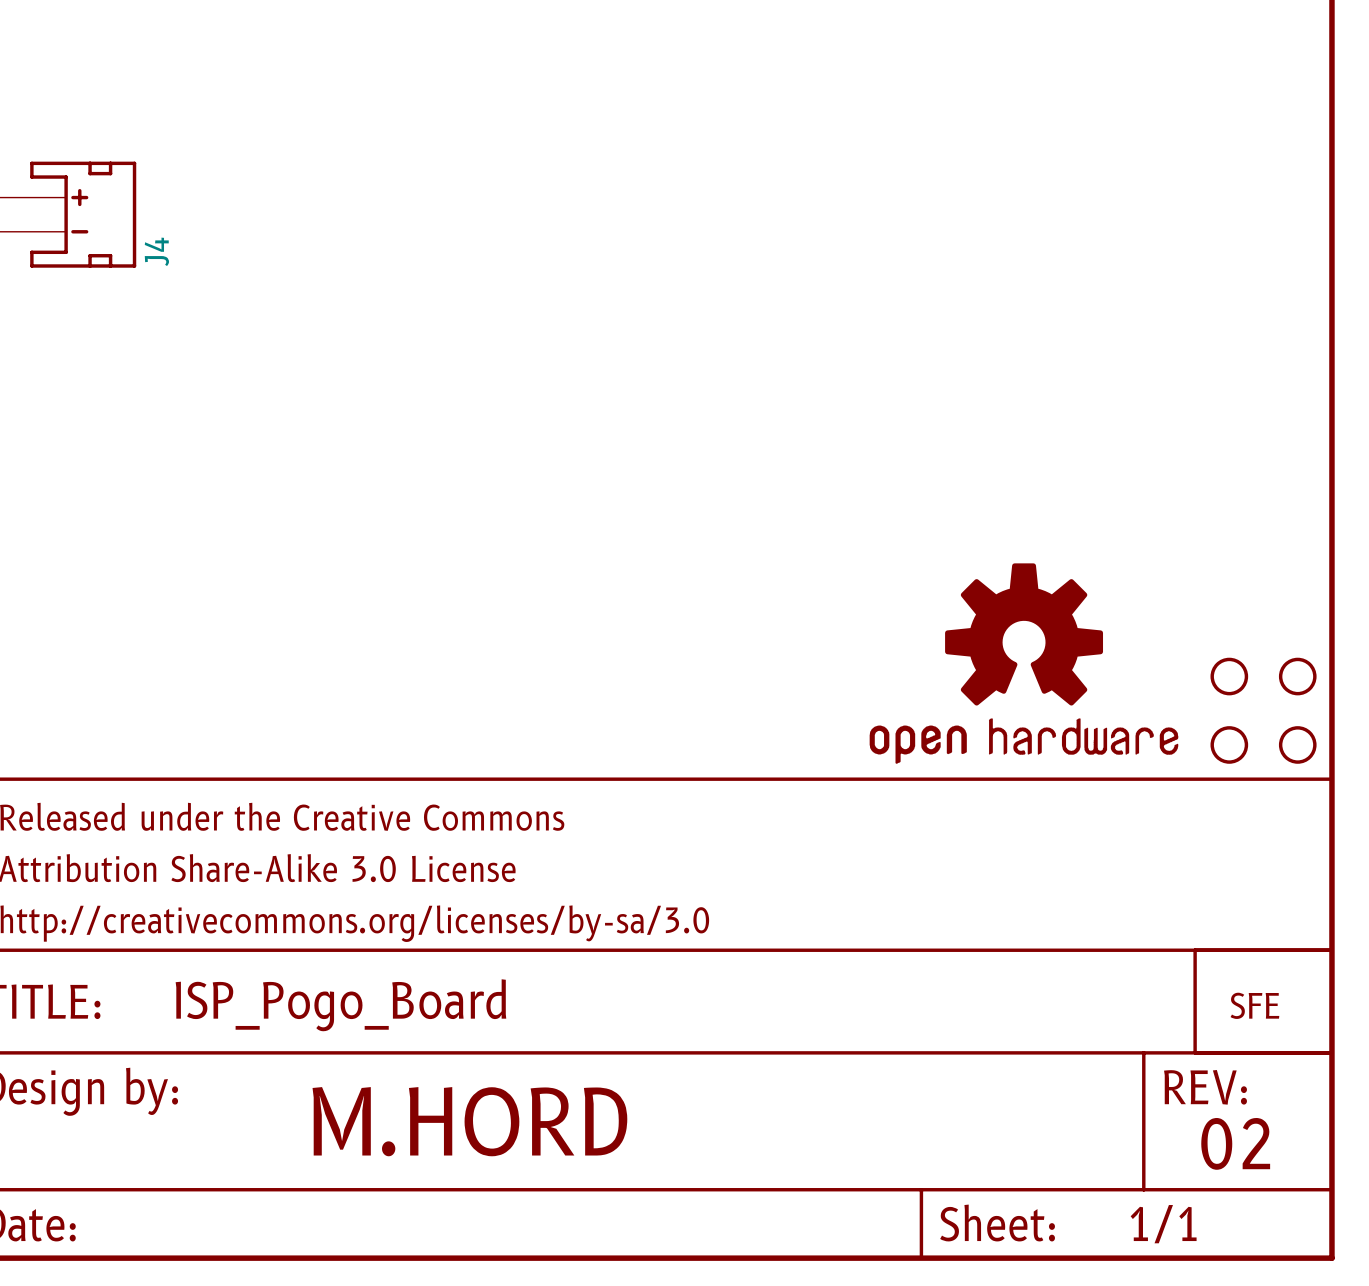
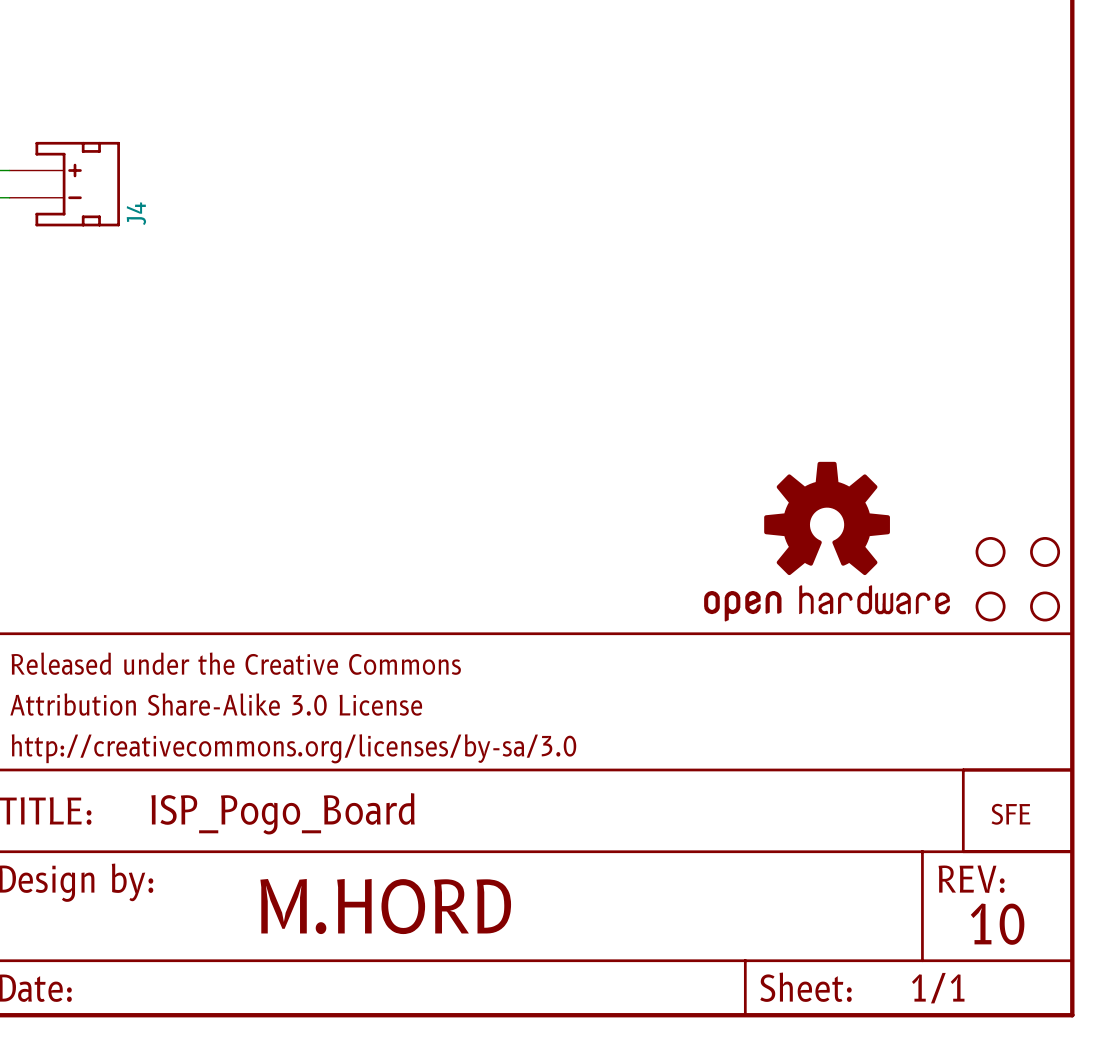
text: 02 (1235, 1143) -> 10 (997, 924)

